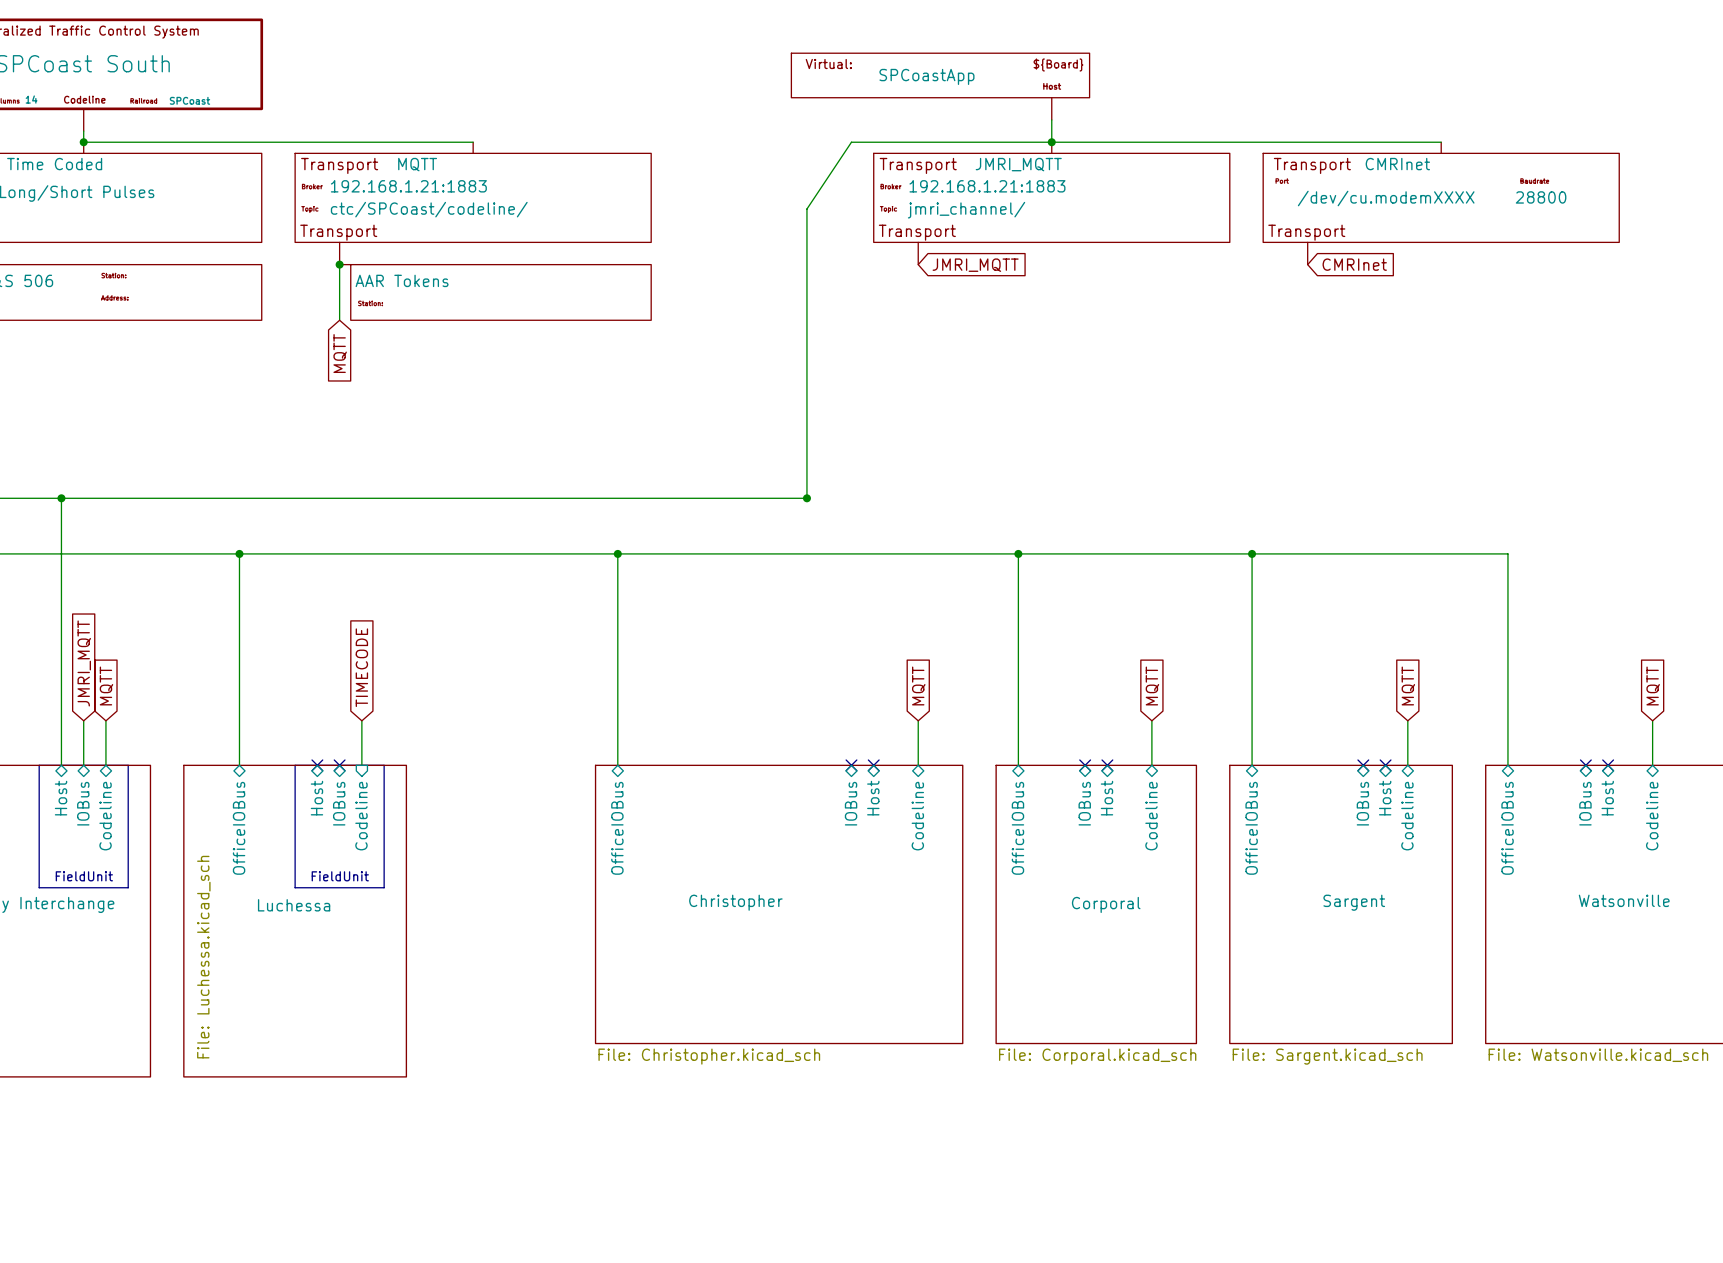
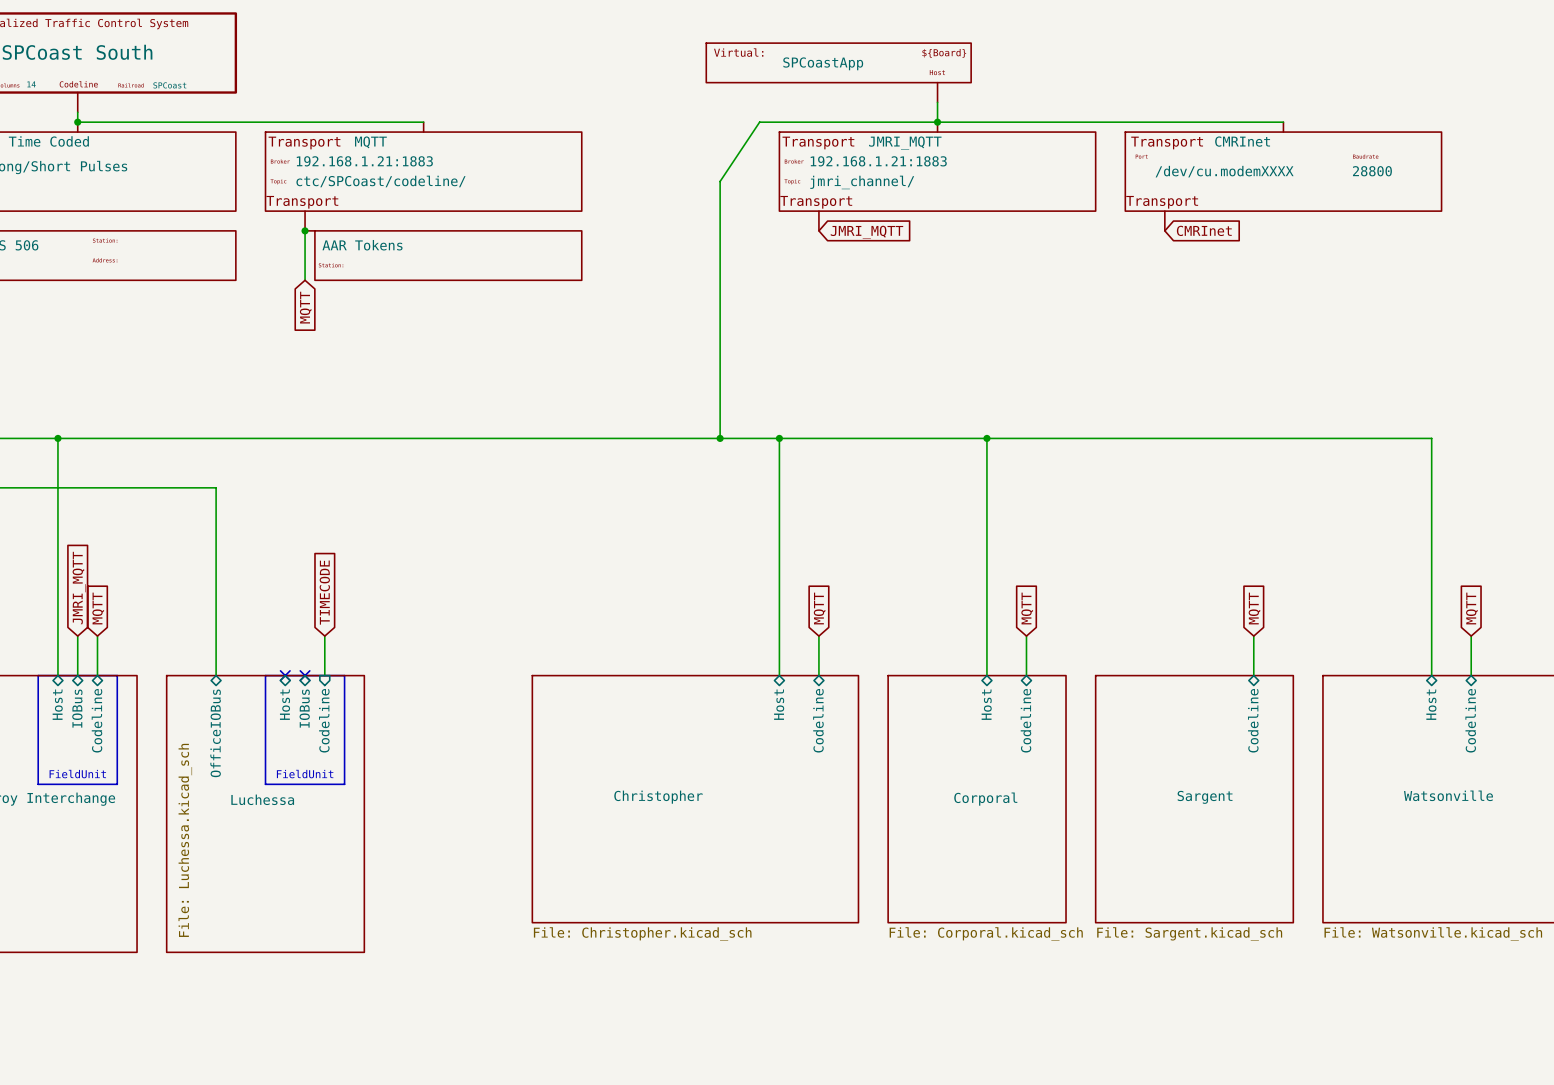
wire: none -> (720, 438) (1431, 438) (1431, 675)
wire: none -> (779, 438) (779, 675)
junction: none -> (779, 438)
wire: none -> (986, 438) (986, 675)
junction: none -> (986, 438)
wire: (239, 553) (1507, 553) (1507, 765) -> none
junction: (239, 553) -> none
wire: (617, 553) (617, 765) -> none
junction: (617, 553) -> none
wire: (1018, 553) (1018, 765) -> none
junction: (1018, 553) -> none
wire: (1252, 553) (1252, 765) -> none
junction: (1252, 553) -> none
no-connect mark: (851, 765) -> none
no-connect mark: (873, 765) -> none
no-connect mark: (1085, 765) -> none
no-connect mark: (1107, 765) -> none
no-connect mark: (1363, 765) -> none
no-connect mark: (1385, 765) -> none
no-connect mark: (1585, 765) -> none
no-connect mark: (1608, 765) -> none
sheet pin: Host (1385, 798) -> none
sheet pin: IOBus (851, 803) -> none
sheet pin: IOBus (1084, 803) -> none
sheet pin: IOBus (1362, 803) -> none
sheet pin: IOBus (1585, 803) -> none
sheet pin: OfficeIOBus (617, 828) -> none
sheet pin: OfficeIOBus (1017, 828) -> none
sheet pin: OfficeIOBus (1251, 828) -> none
sheet pin: OfficeIOBus (1507, 828) -> none

